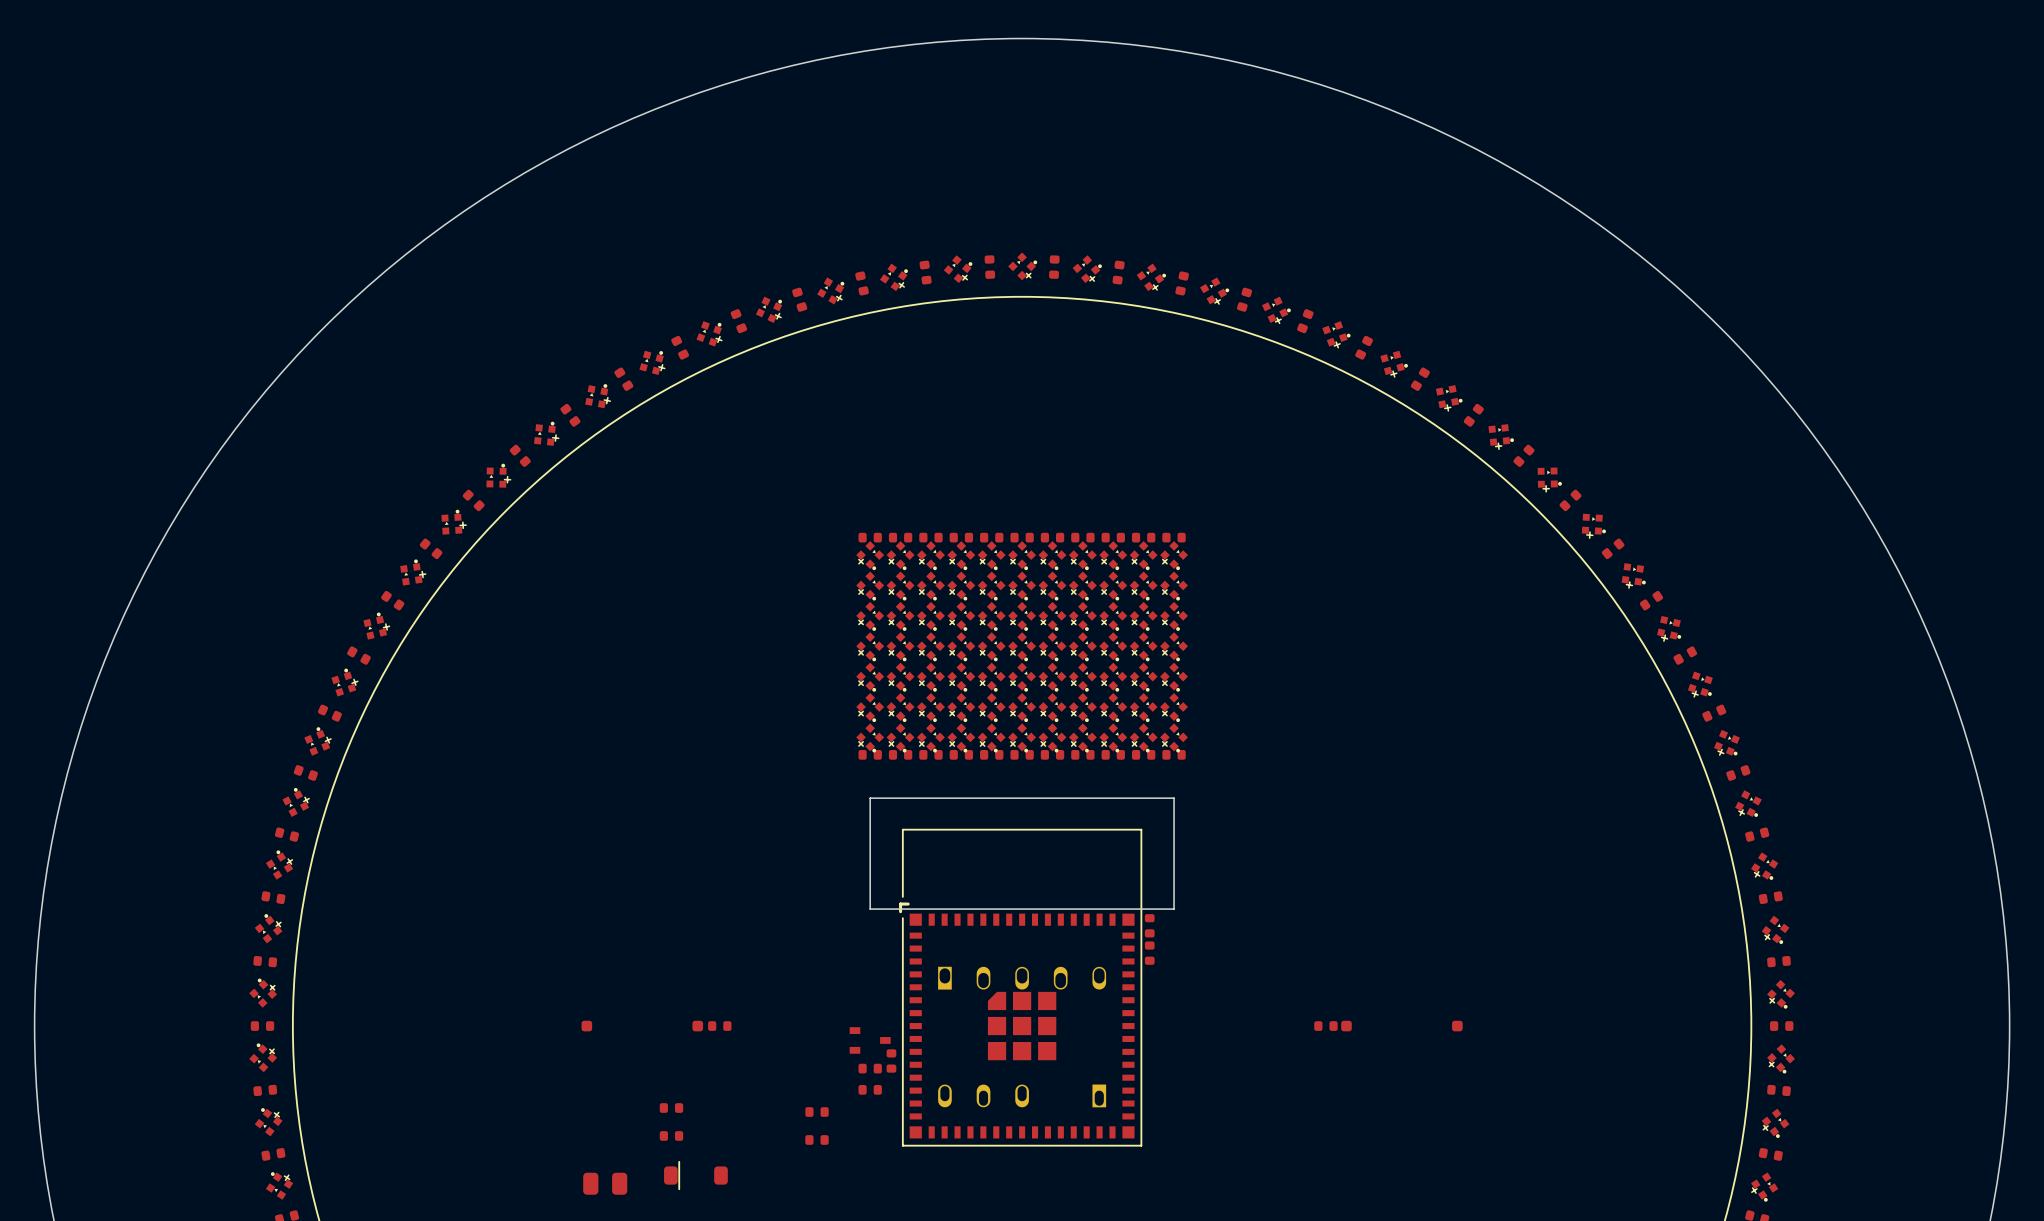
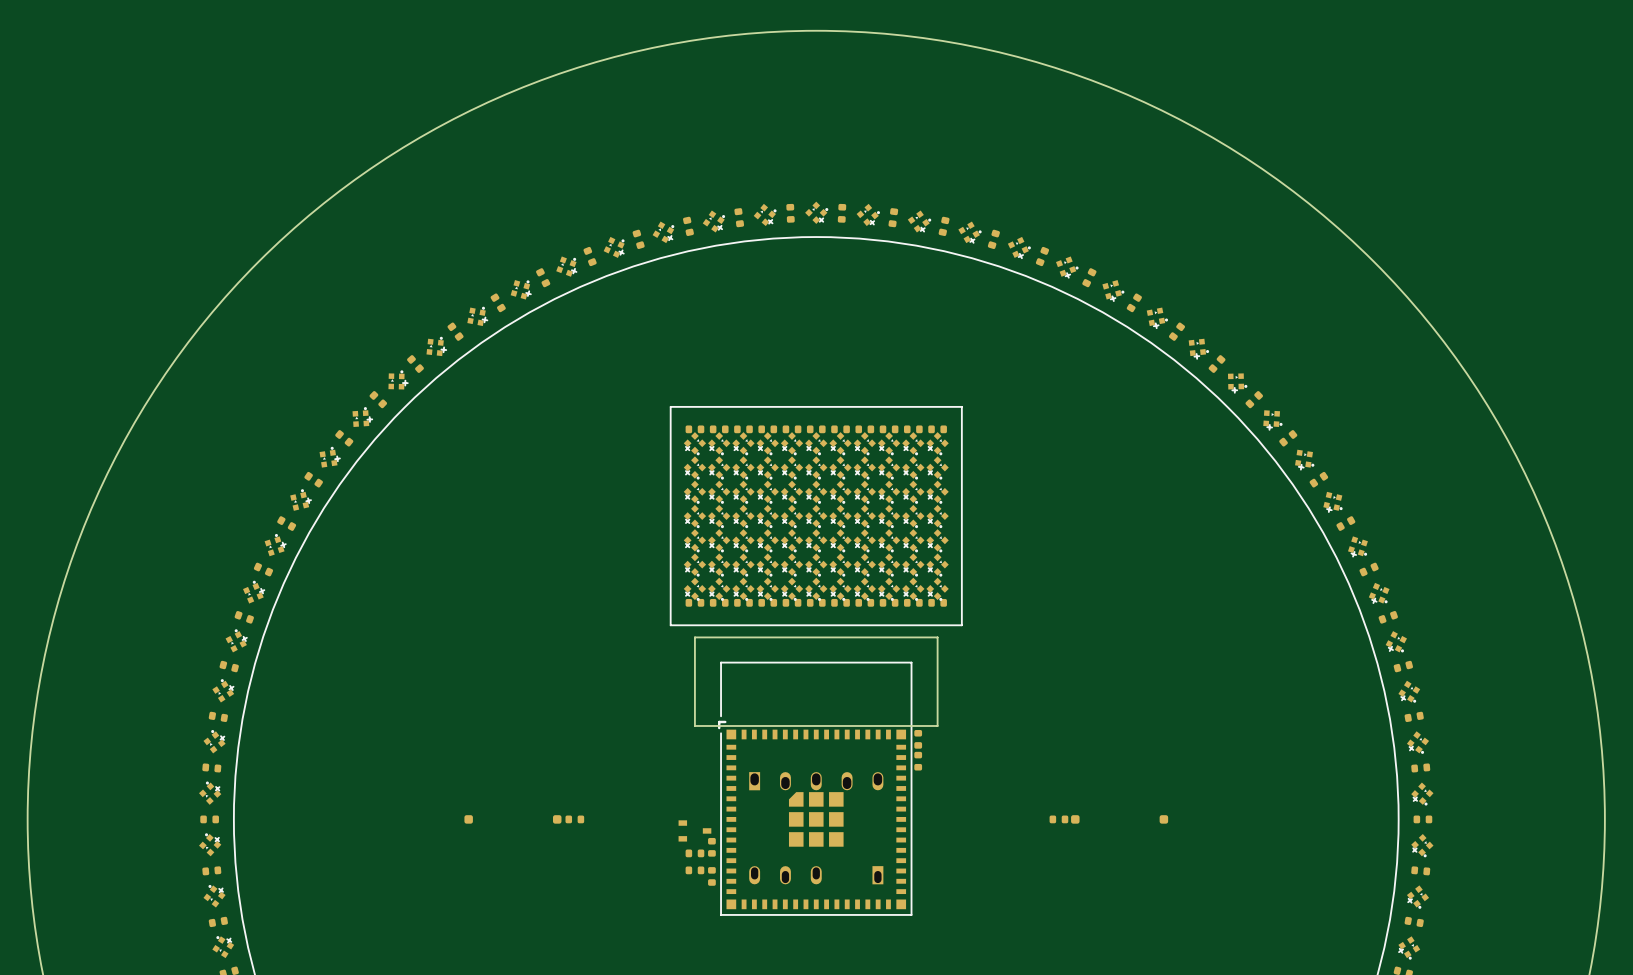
line: none -> (670, 406) (961, 406) (961, 625) (670, 625) (670, 406)
part: none -> (711, 876)
part: (671, 1108) -> none
part: (817, 1112) -> none
part: (671, 1135) -> none
part: (817, 1139) -> none
part: (695, 1175) -> none
part: (605, 1183) -> none

